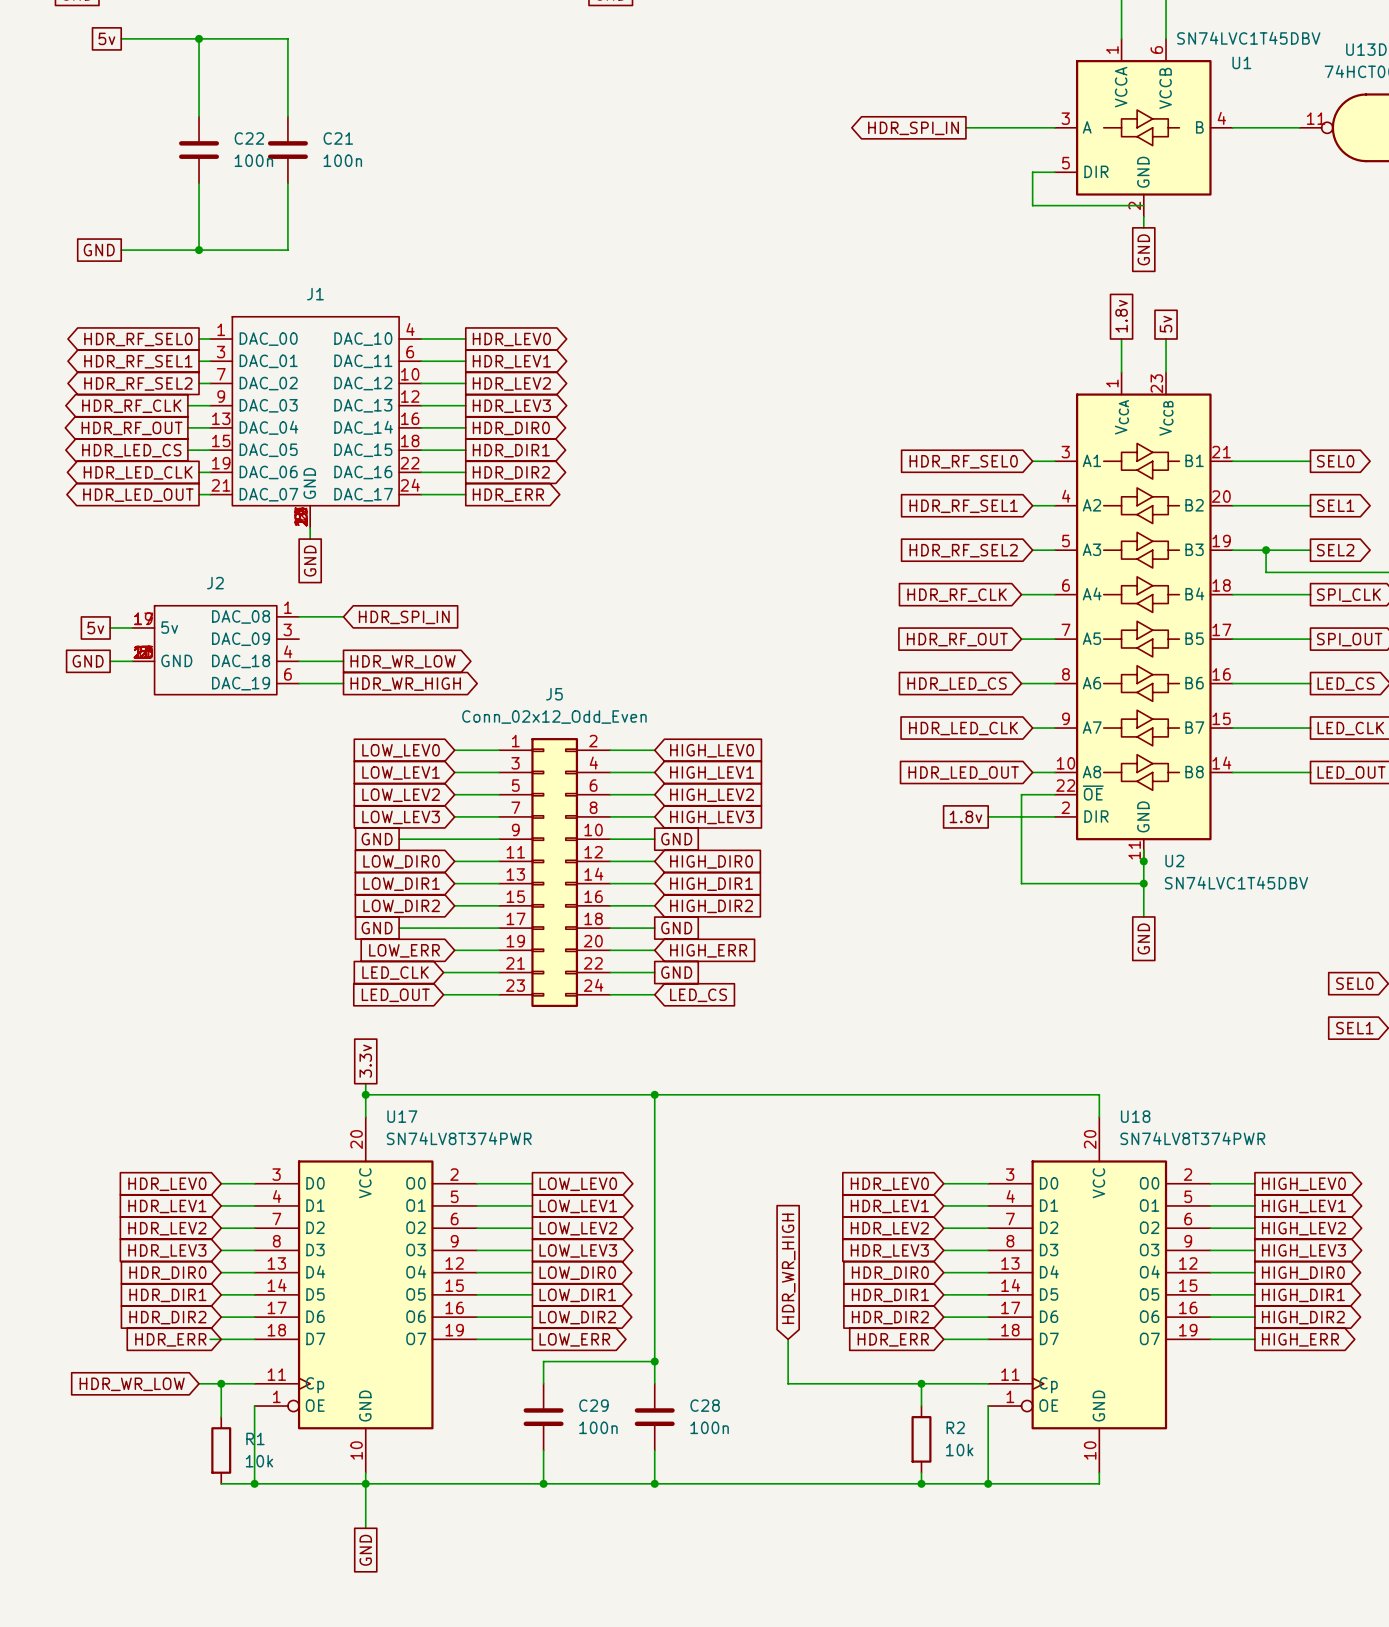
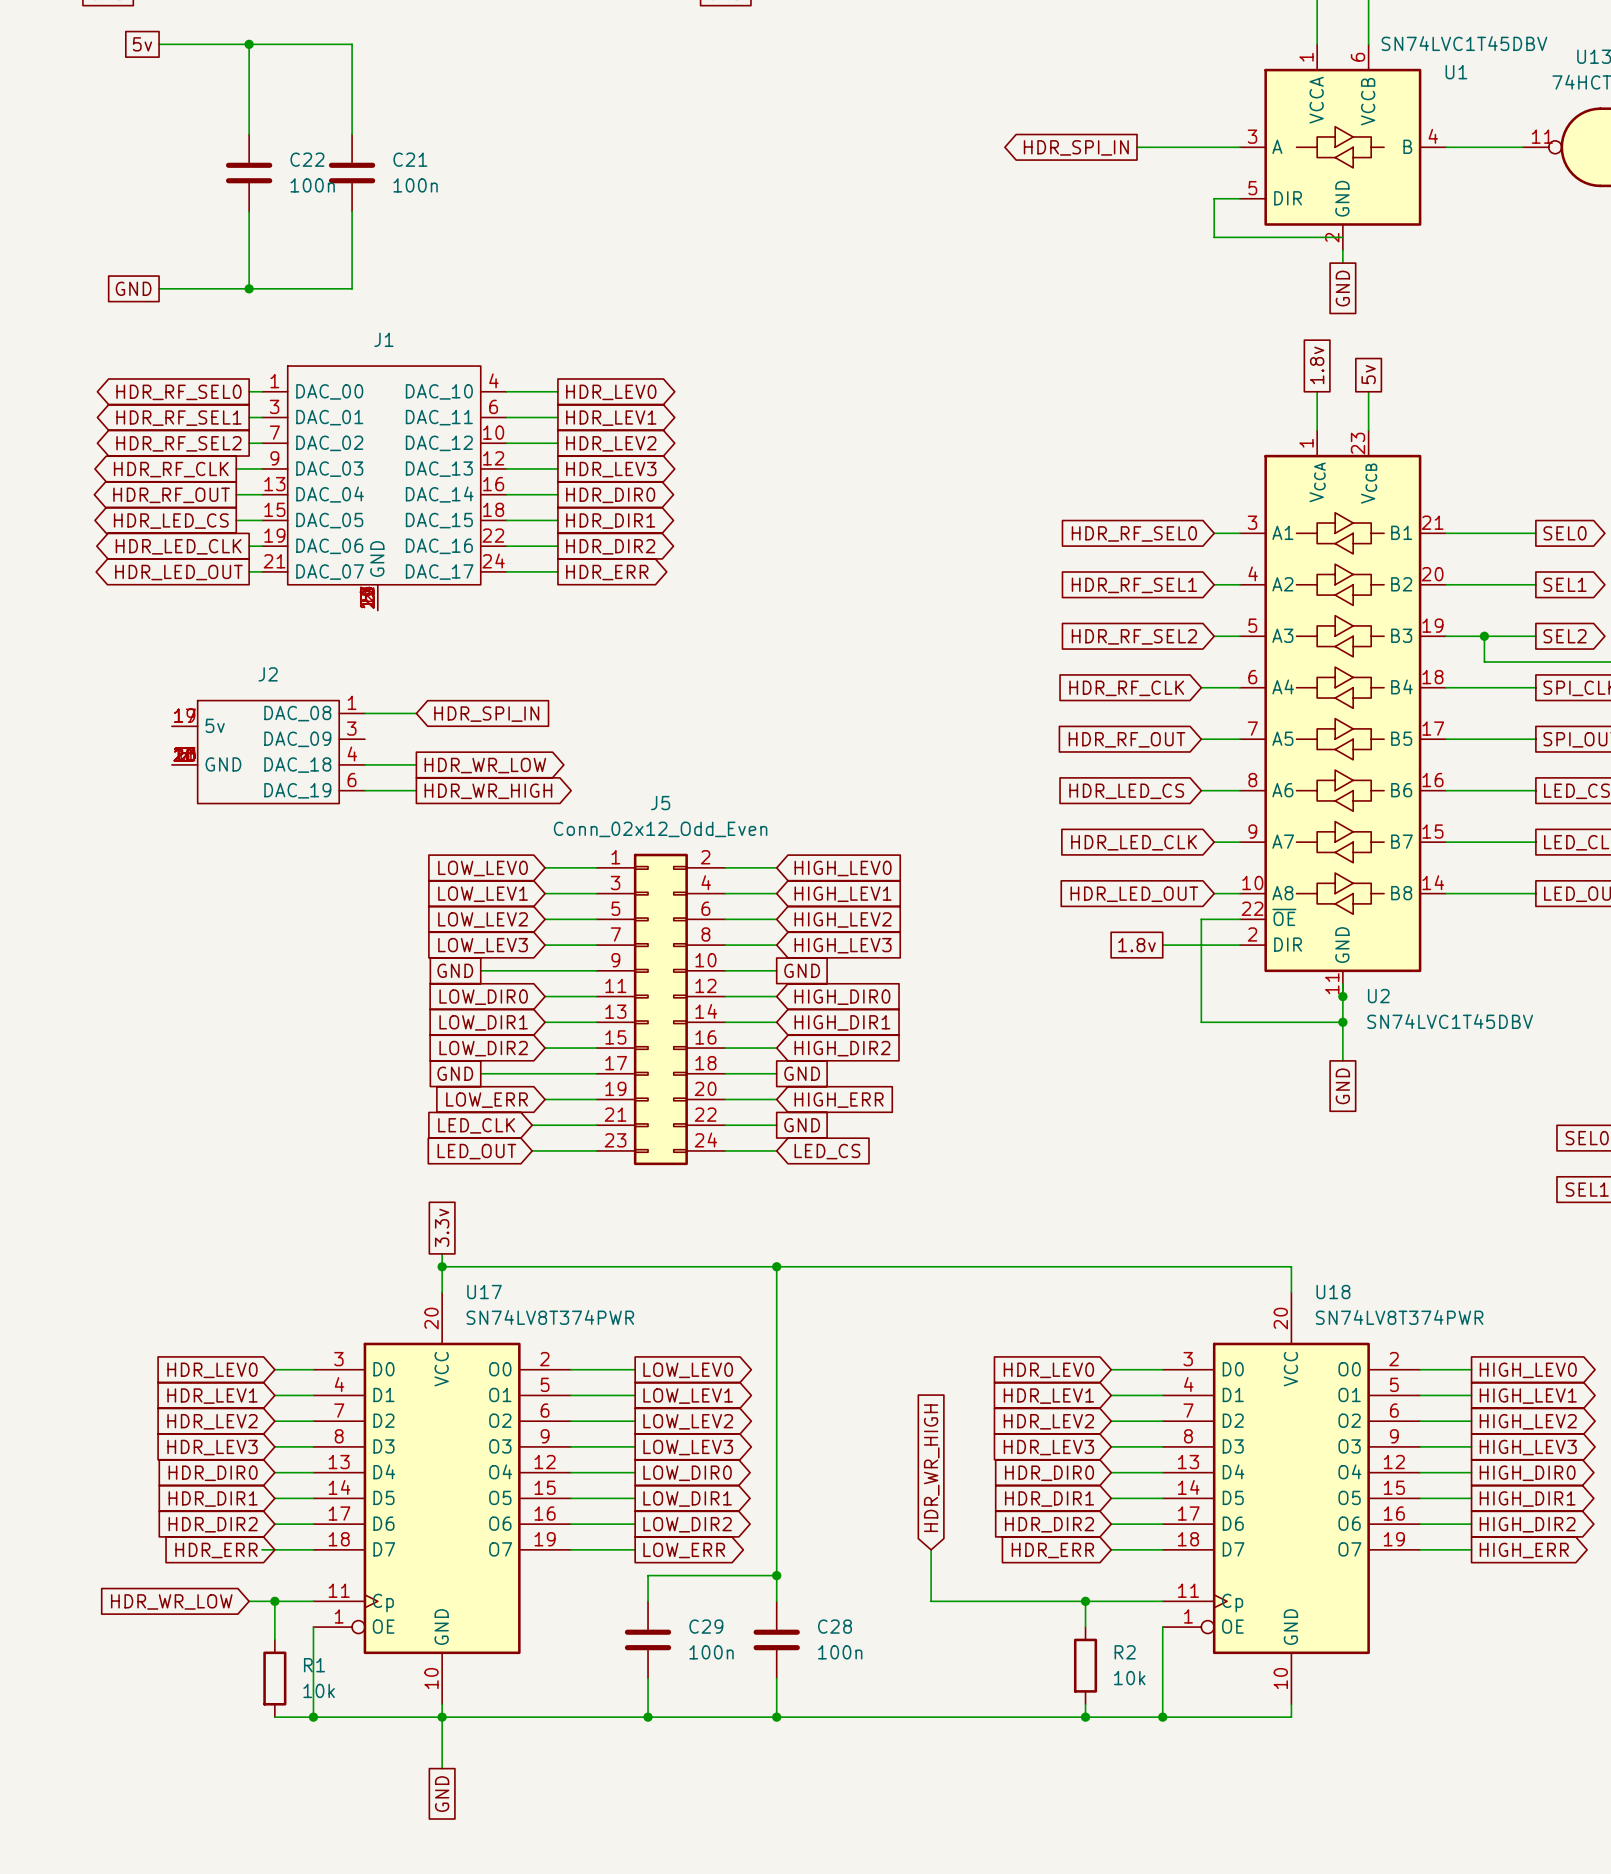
wire: (310, 527) (310, 539) -> none
global label: GND (310, 561) -> none
global label: 5v (95, 627) -> none
wire: (110, 627) (132, 627) -> none
global label: GND (88, 661) -> none
wire: (110, 661) (132, 661) -> none

